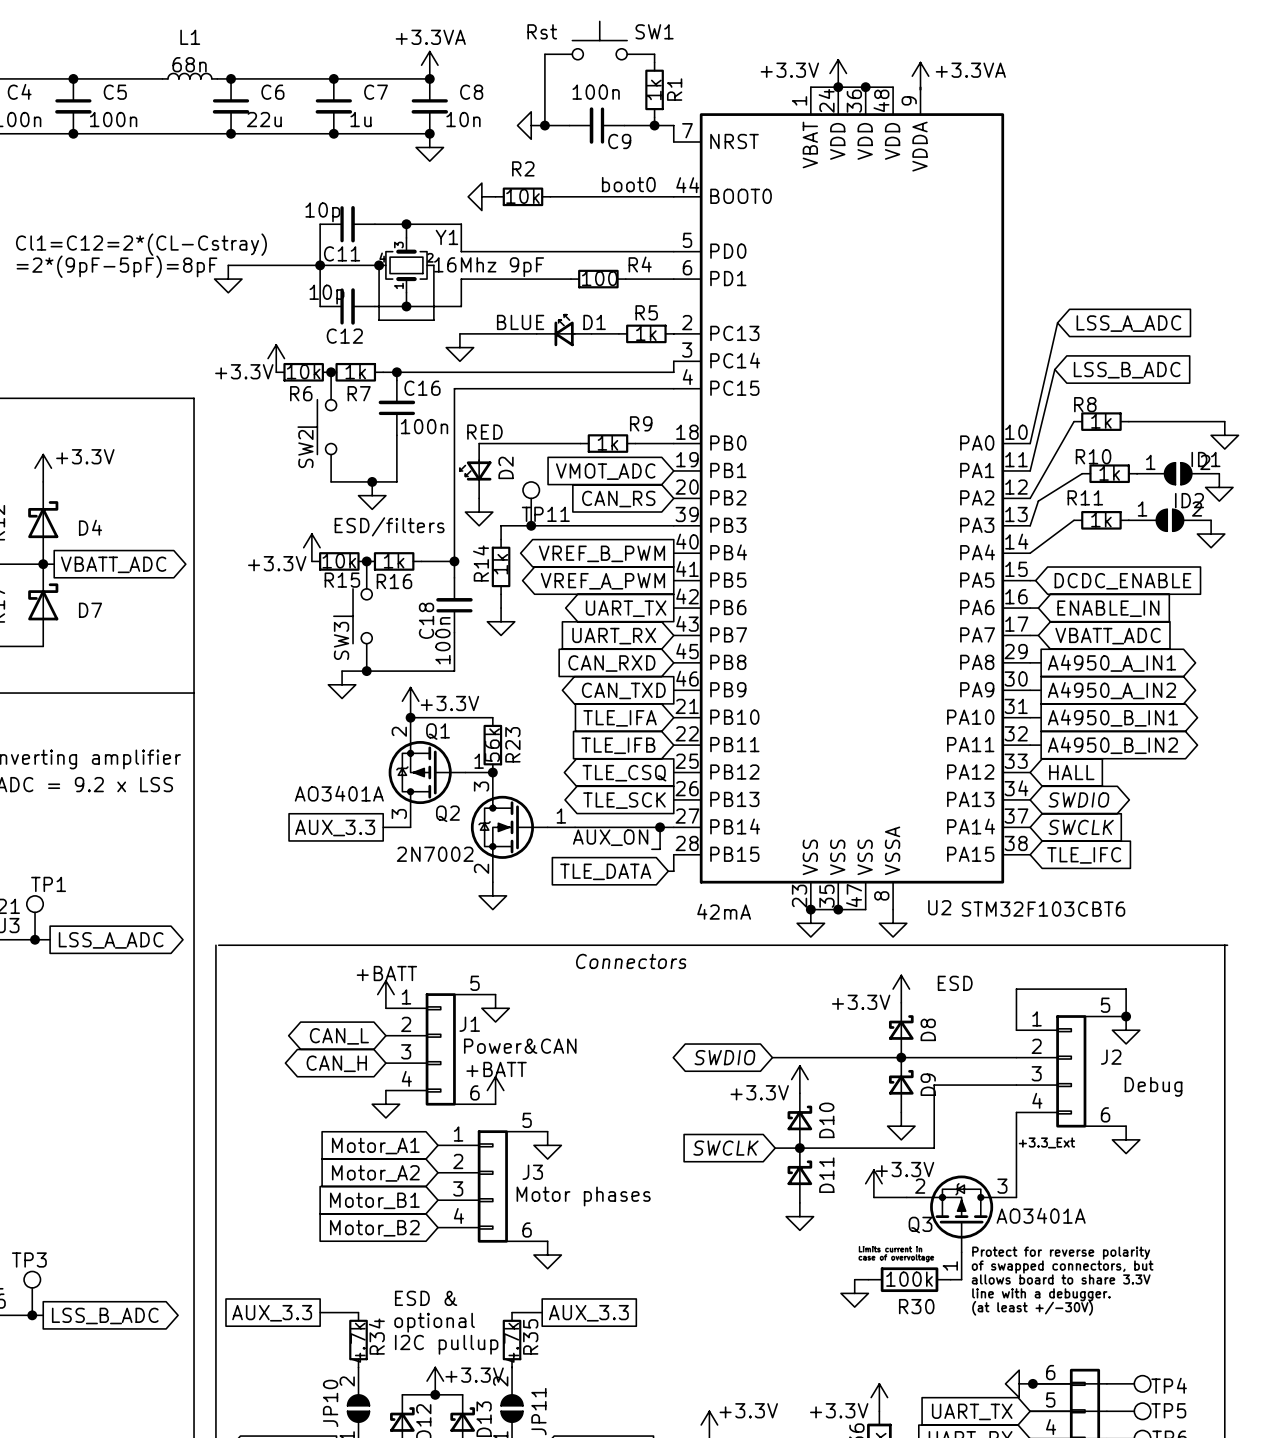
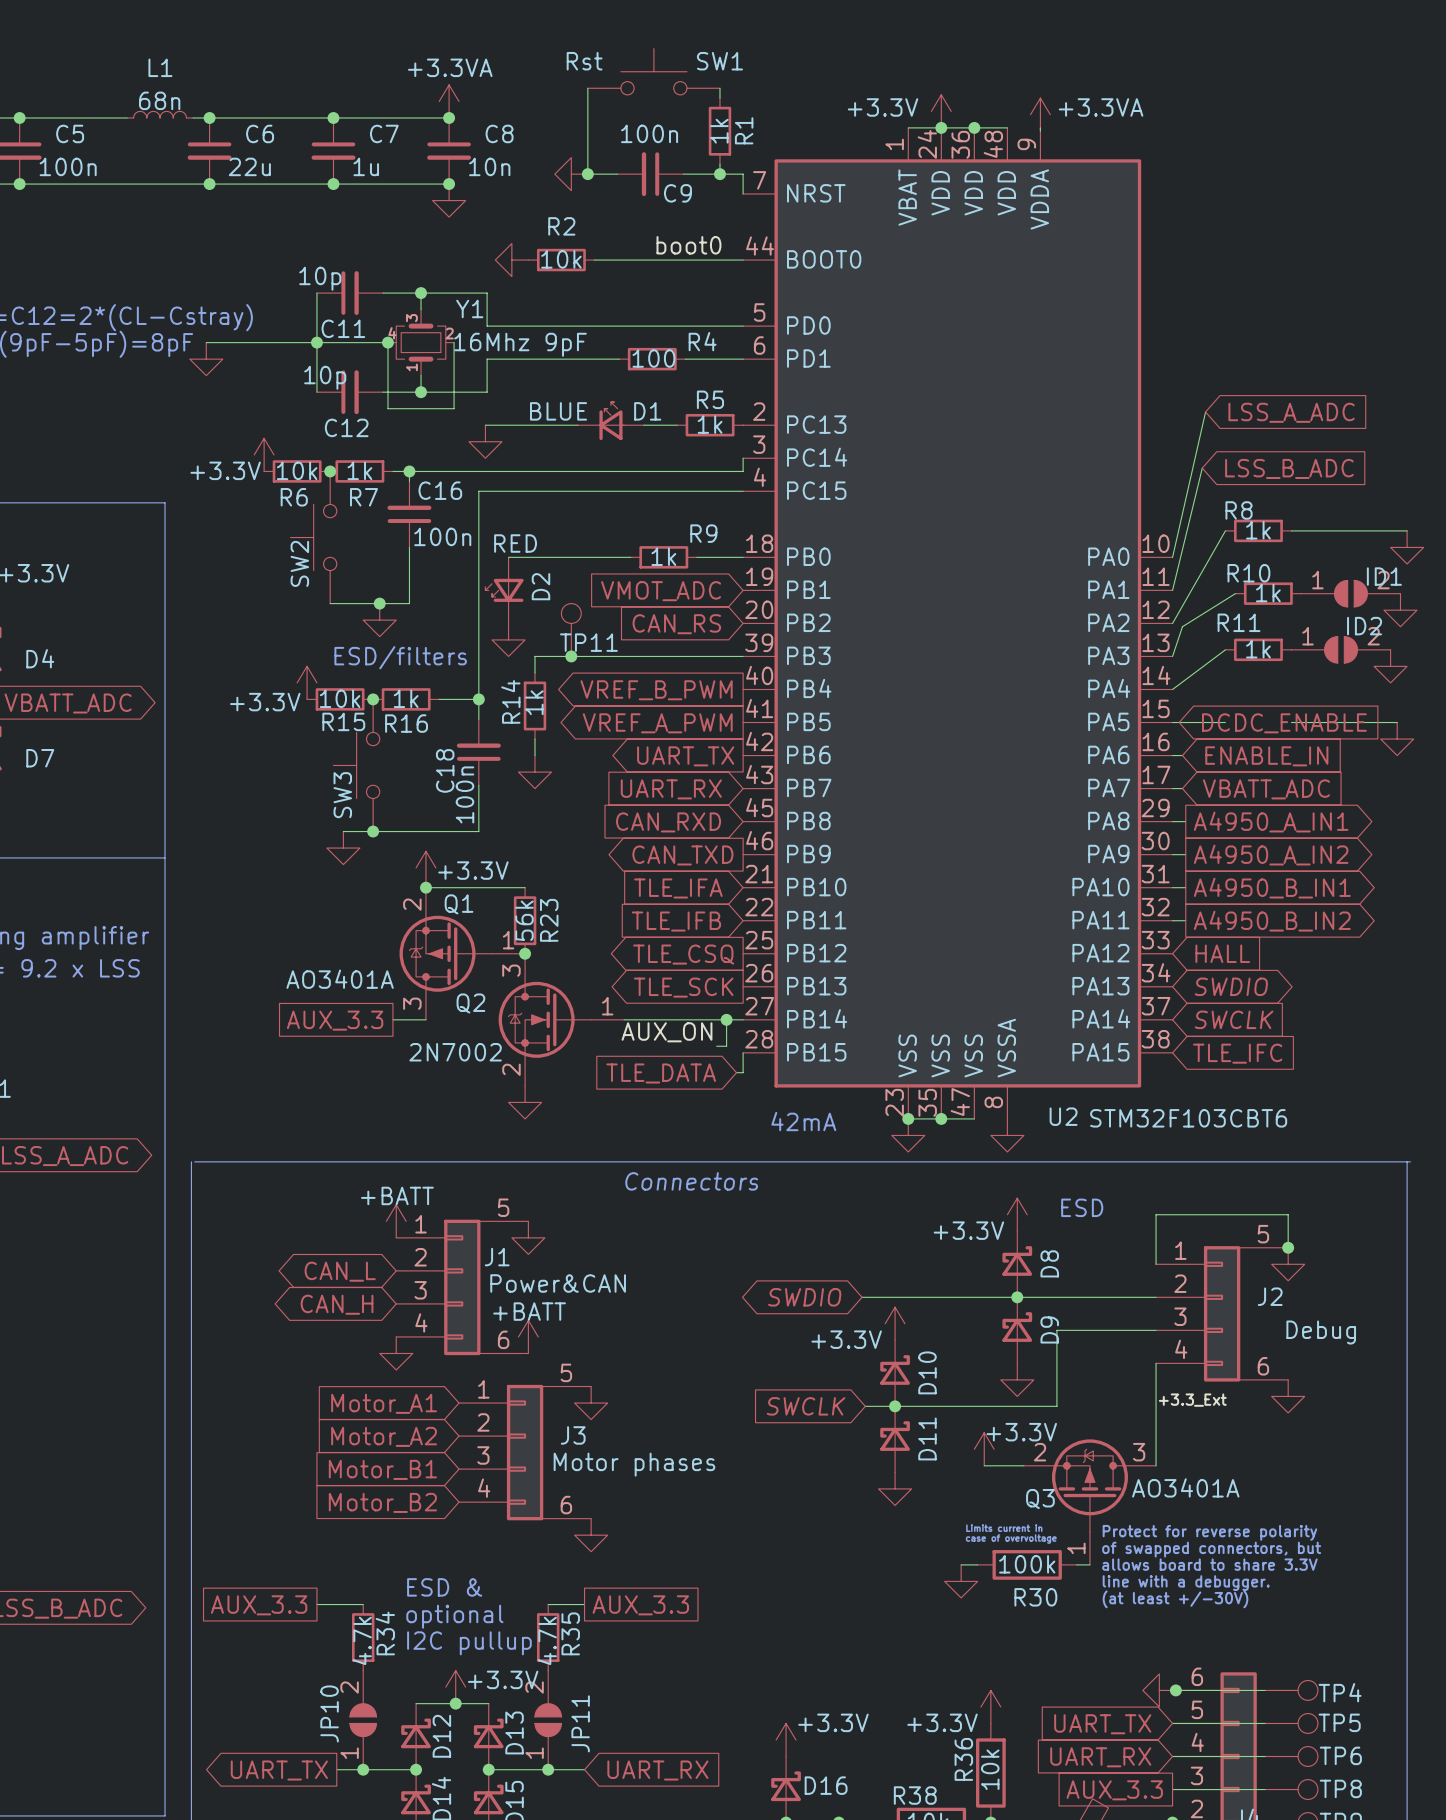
wire: none -> (1179, 722) (1225, 722)
wire: none -> (1291, 722) (1397, 722)
power symbol: none -> (1397, 739)

